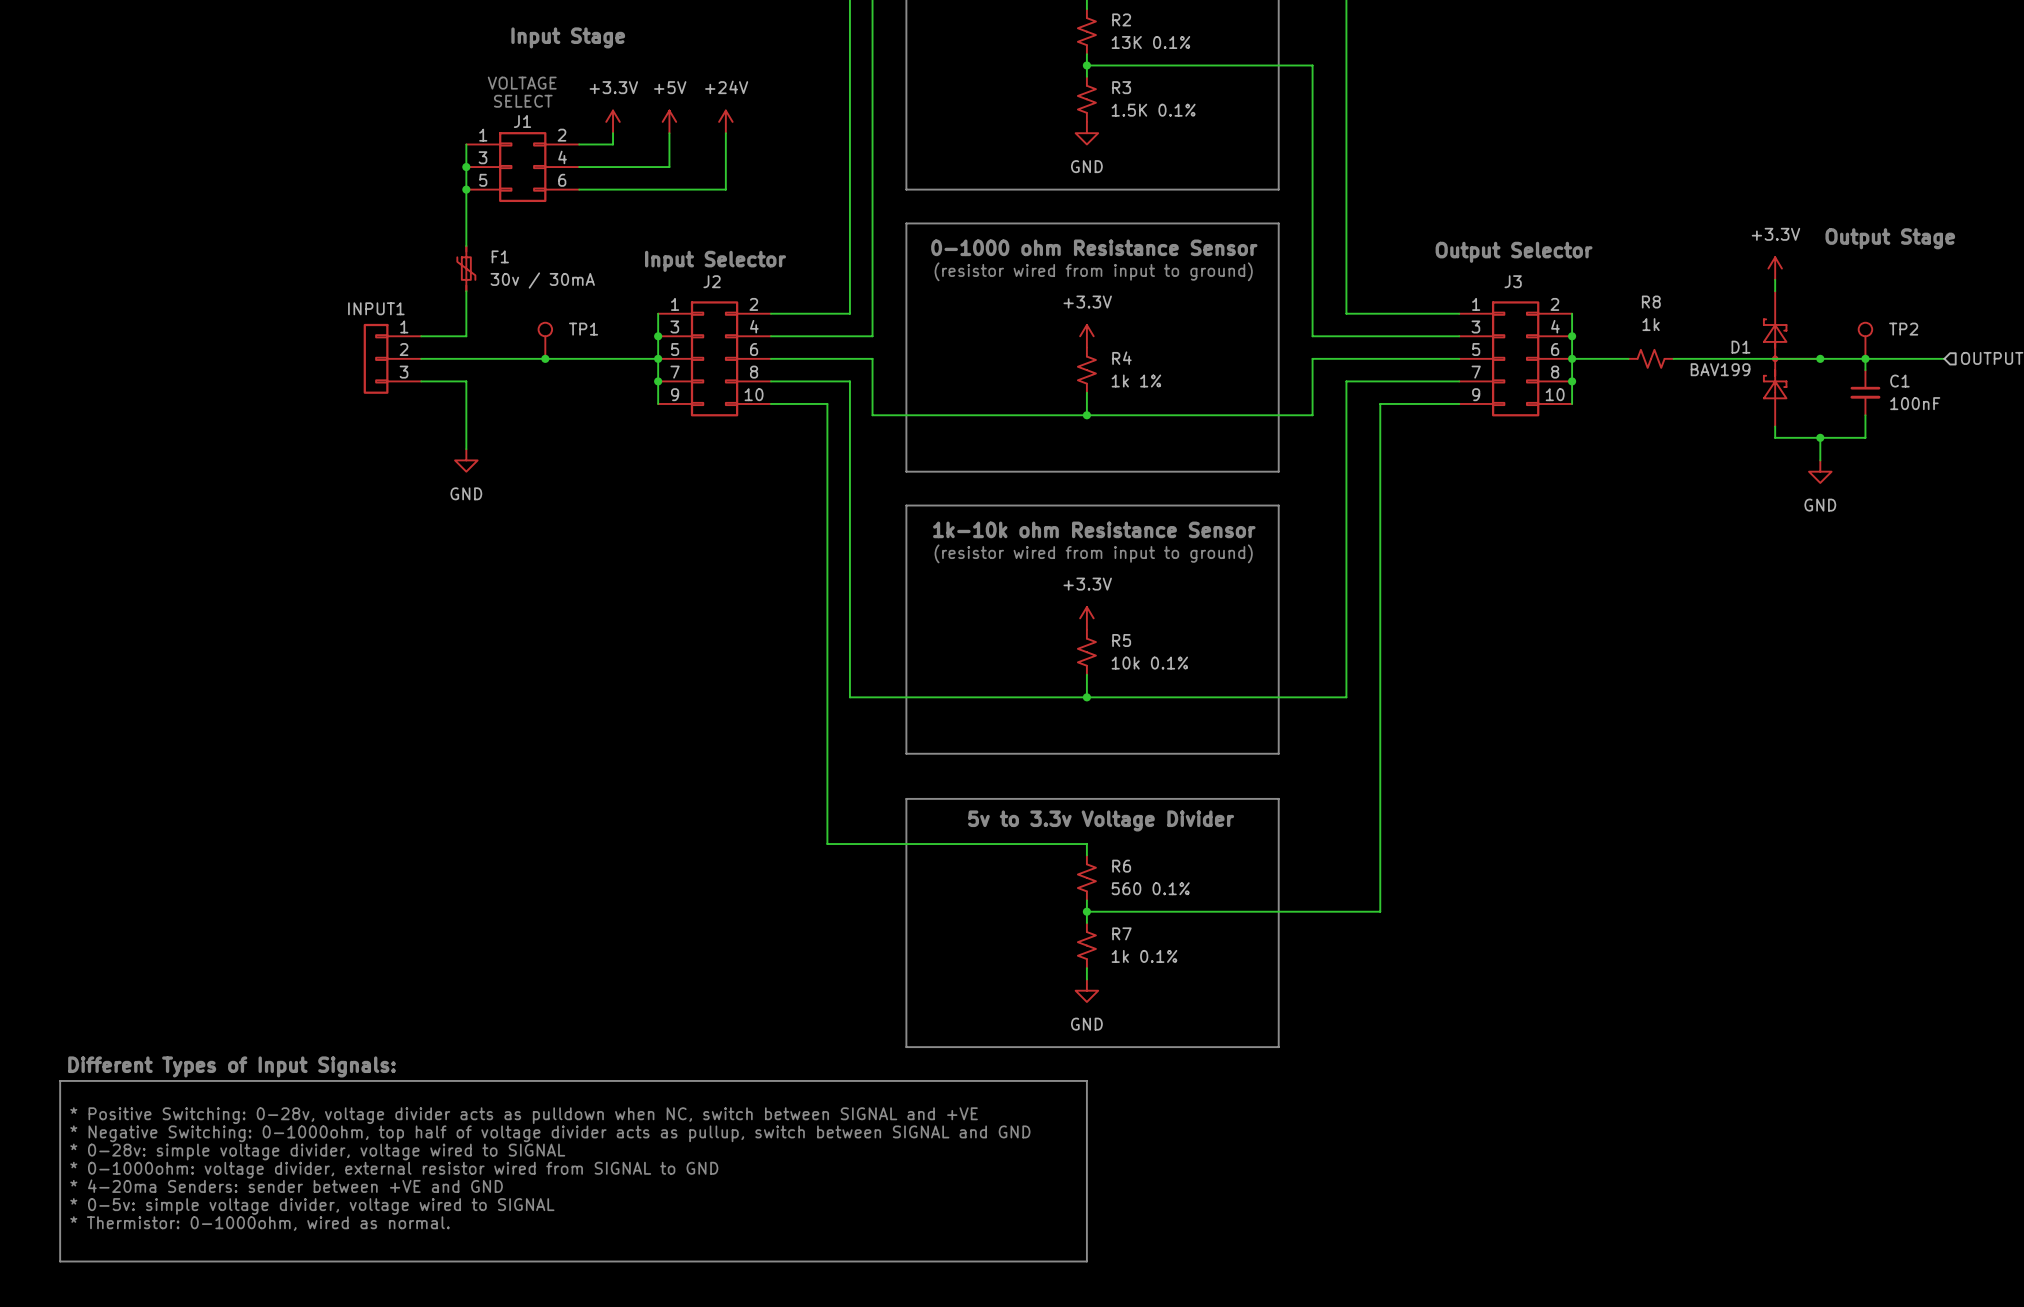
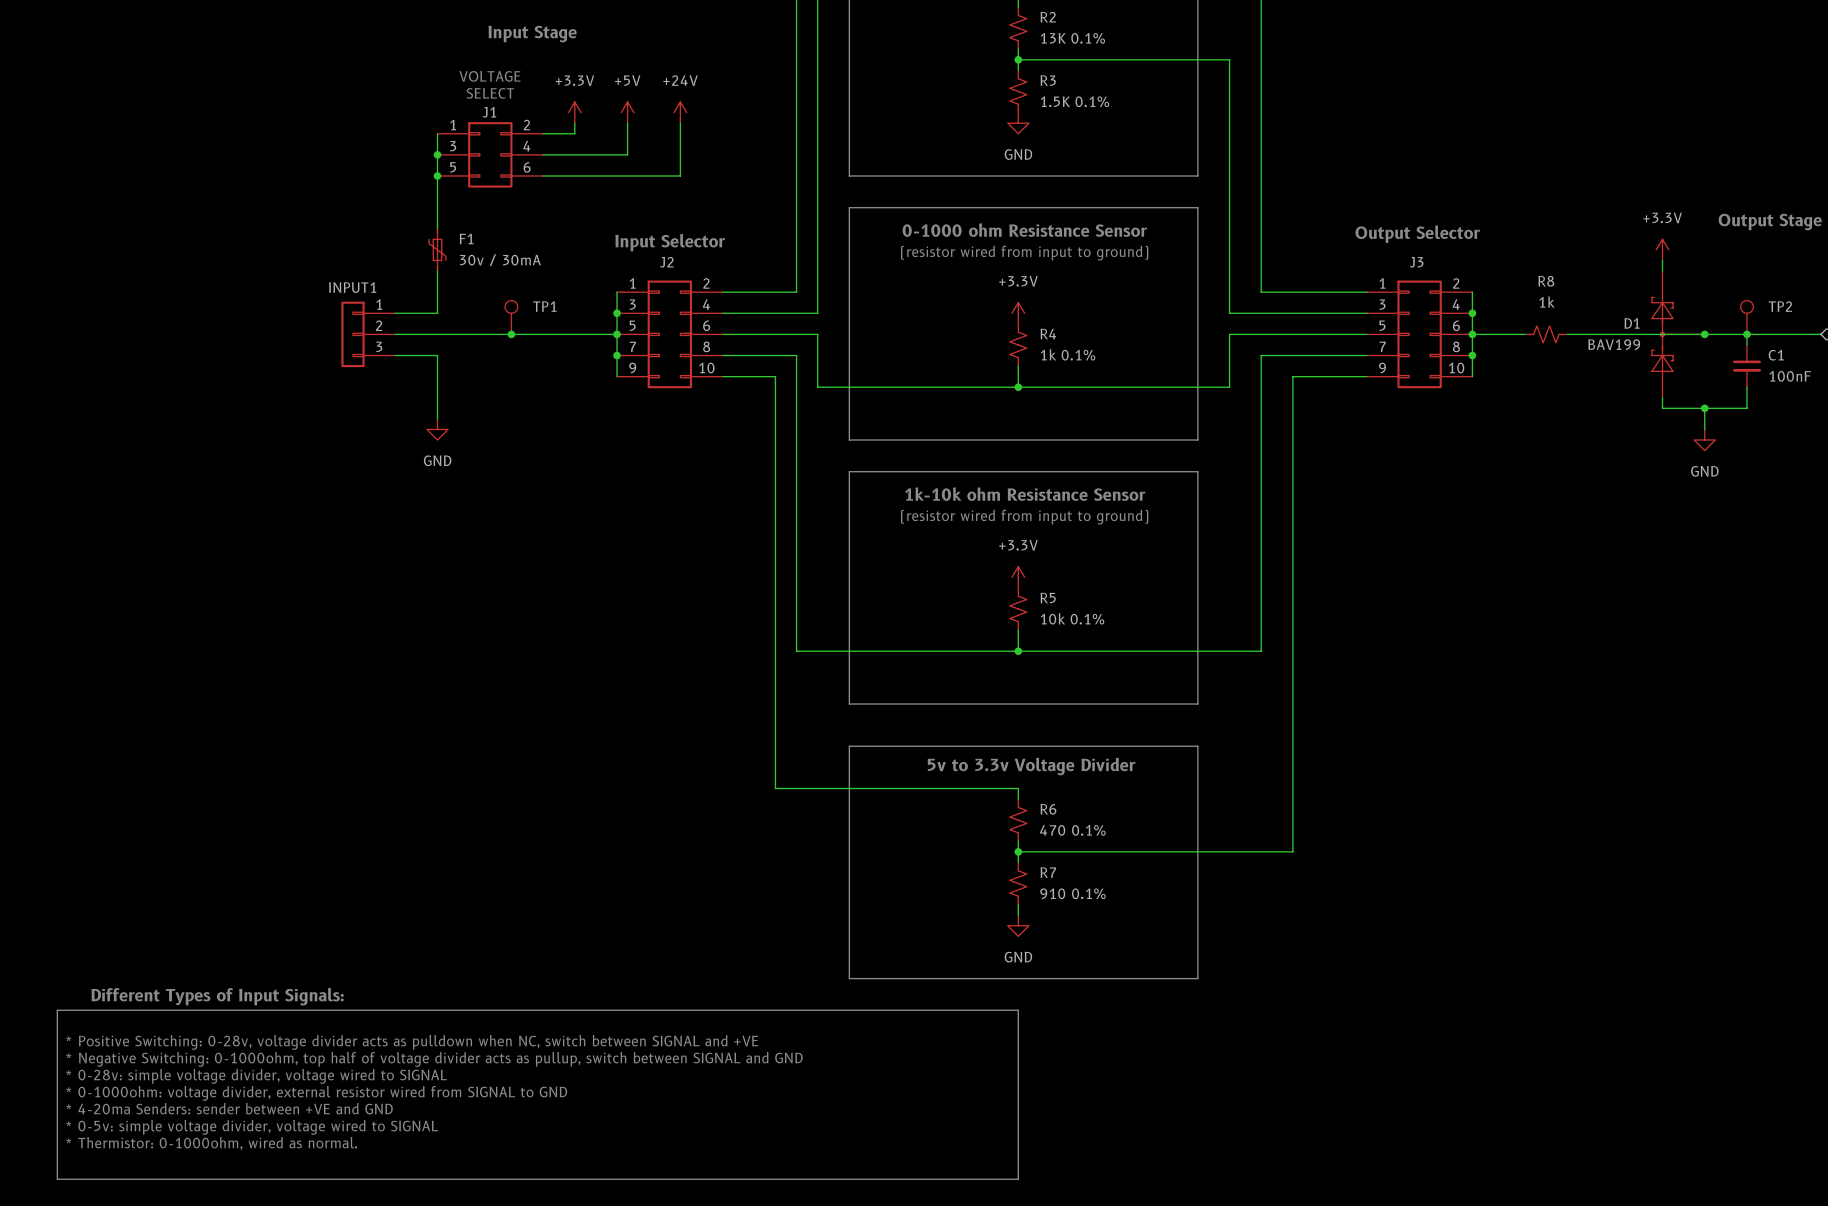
R4 value: 1k 1% (1136, 381) -> 1k 0.1% (1068, 354)
R6 value: 560 0.1% (1150, 888) -> 470 0.1% (1072, 830)
R7 value: 1k 0.1% (1144, 956) -> 910 0.1% (1073, 893)

